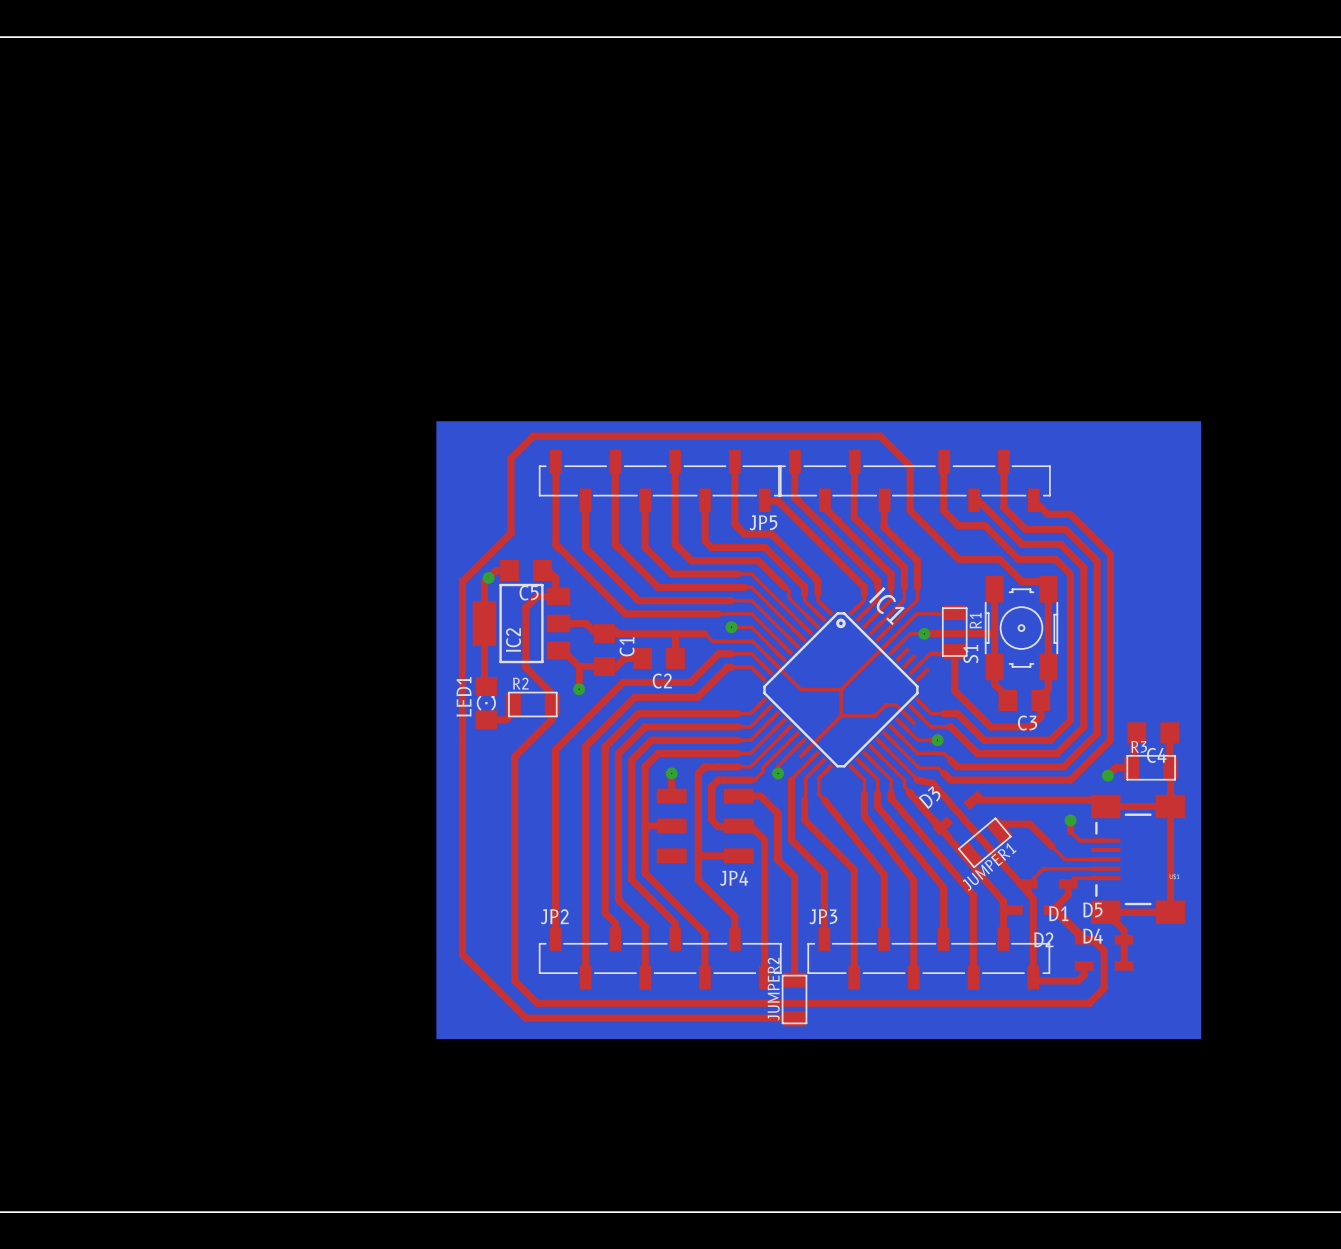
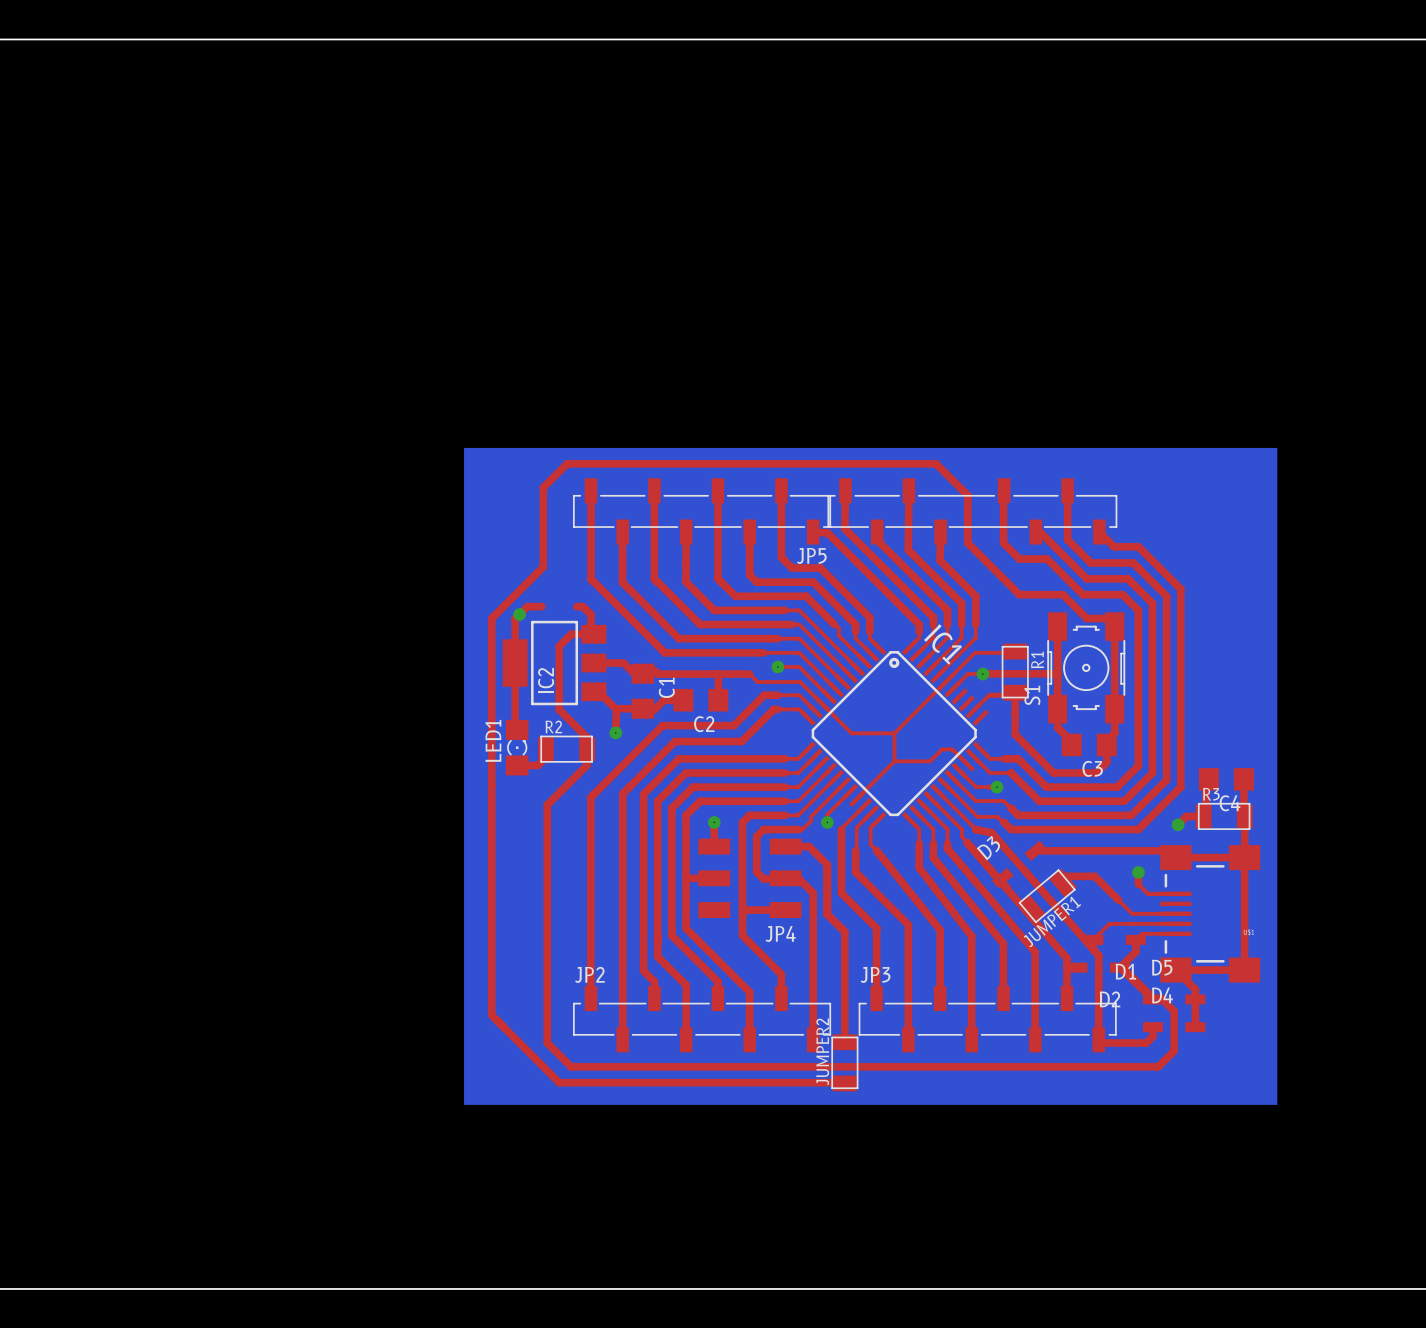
C5: (525, 570) -> none

